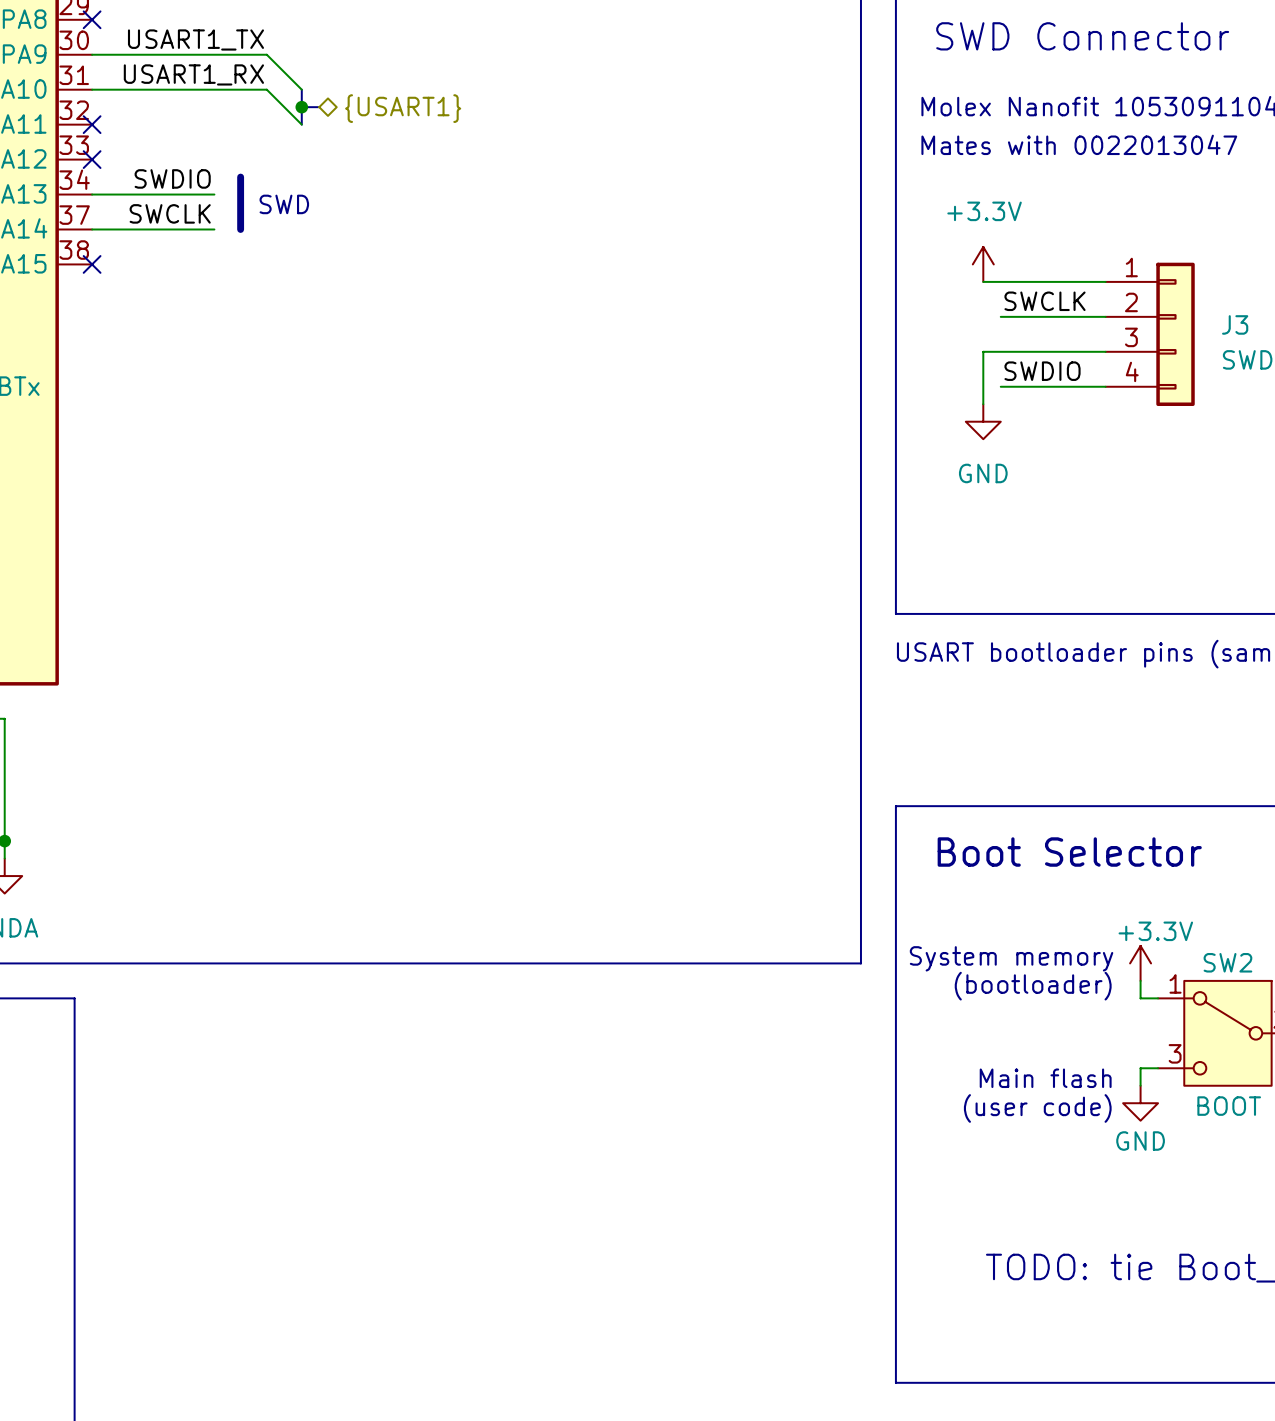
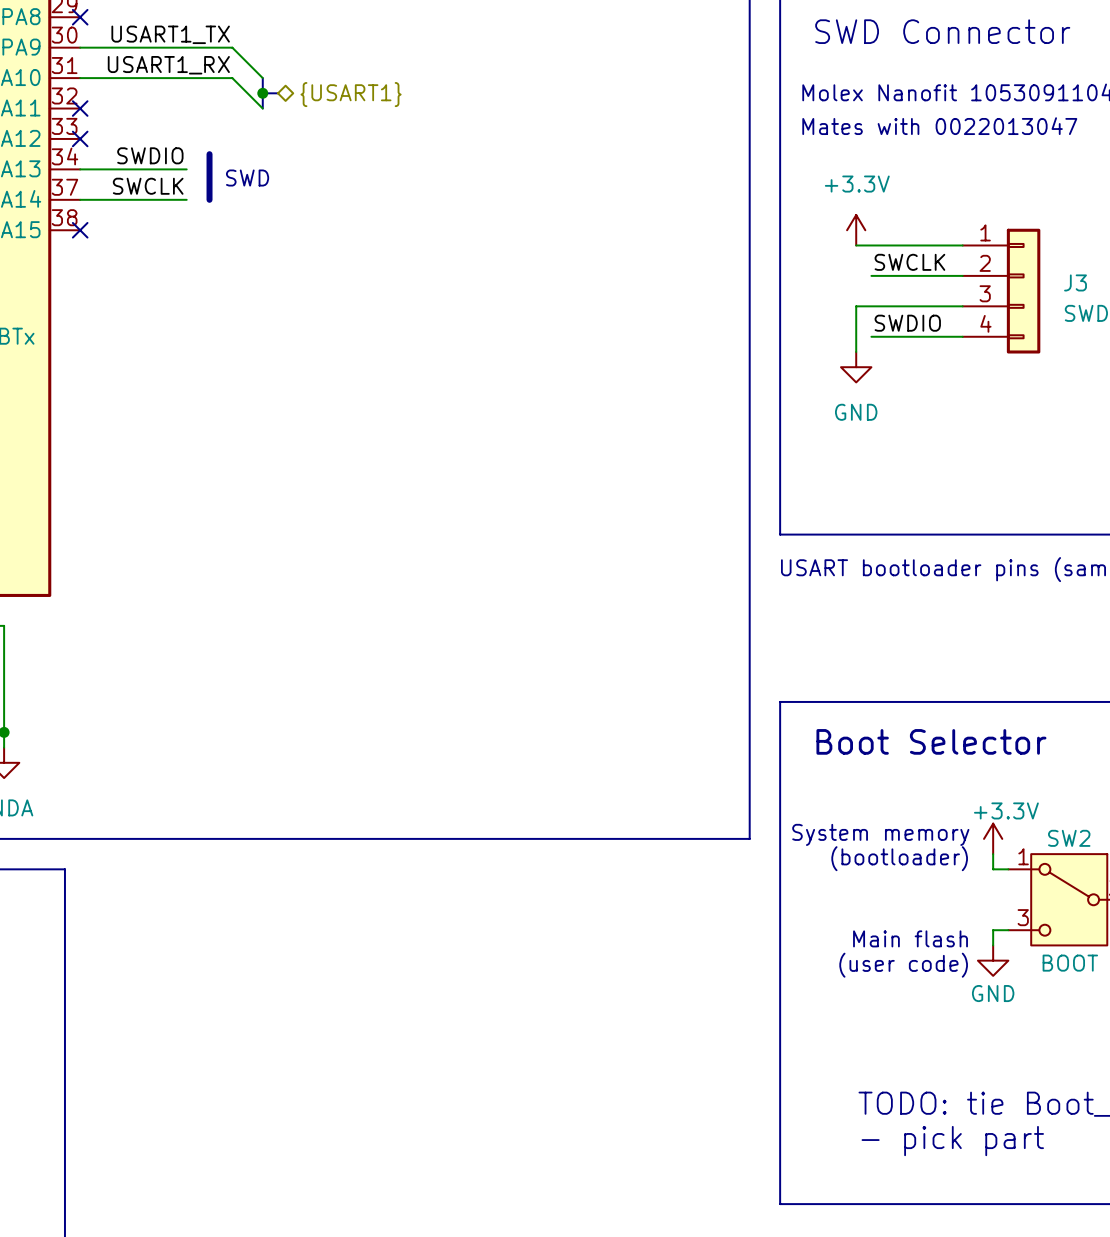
text: none -> - pick part (952, 1141)

